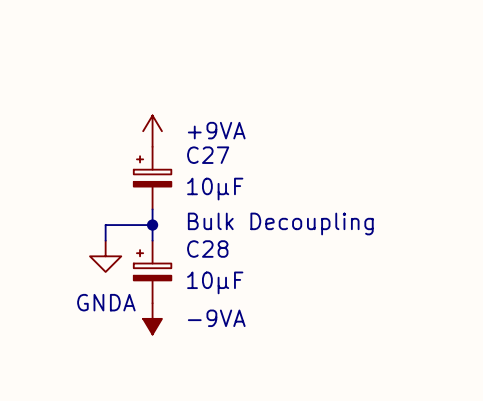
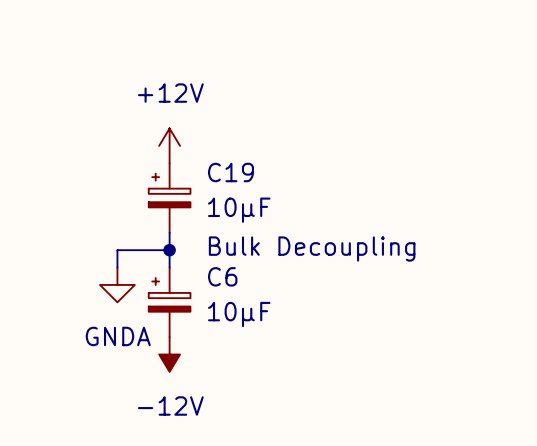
power symbol: +9VA (152, 131) -> +12V (169, 145)
C27 name: C27 (208, 155) -> C19 (230, 172)
C28 name: C28 (207, 249) -> C6 (222, 276)
power symbol: -9VA (152, 318) -> -12V (169, 354)

